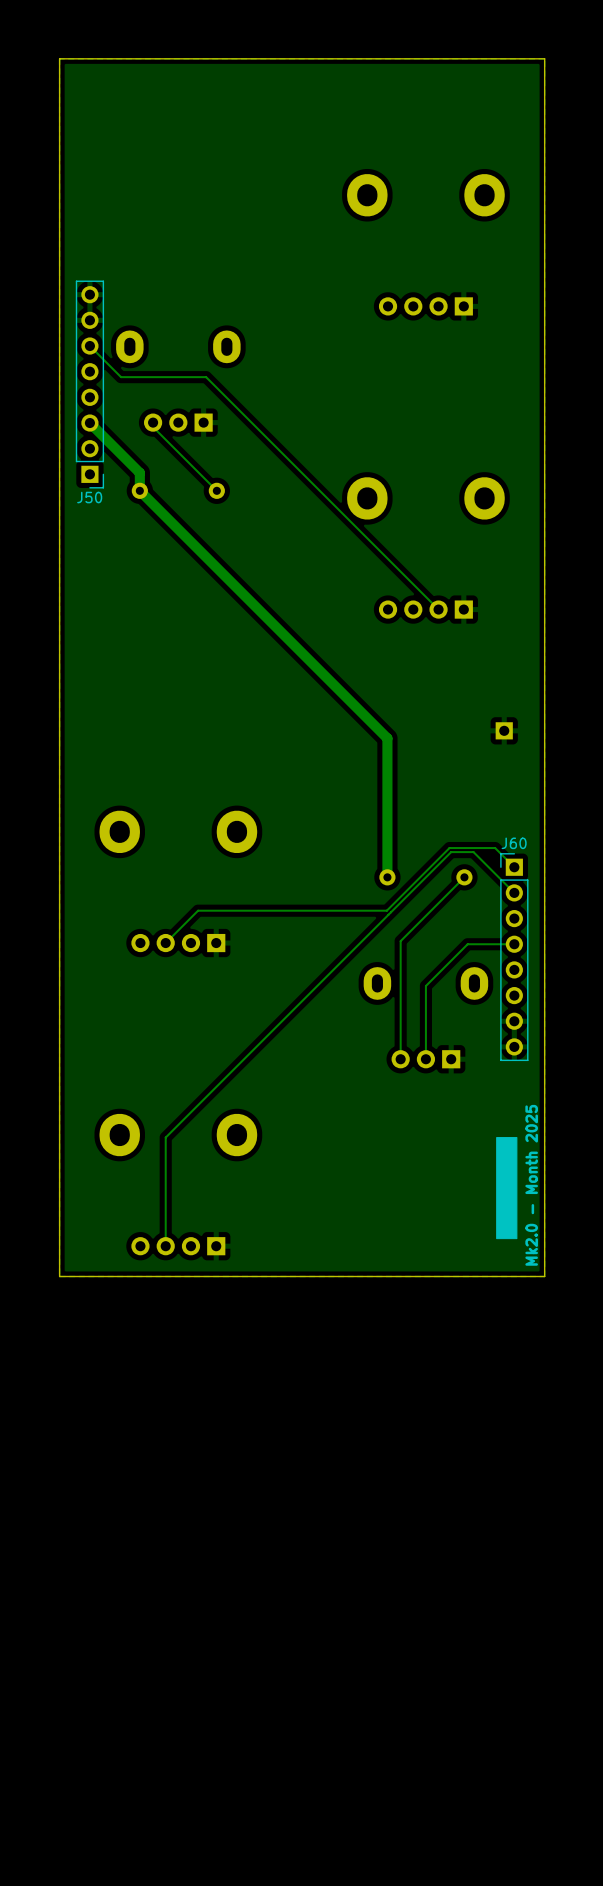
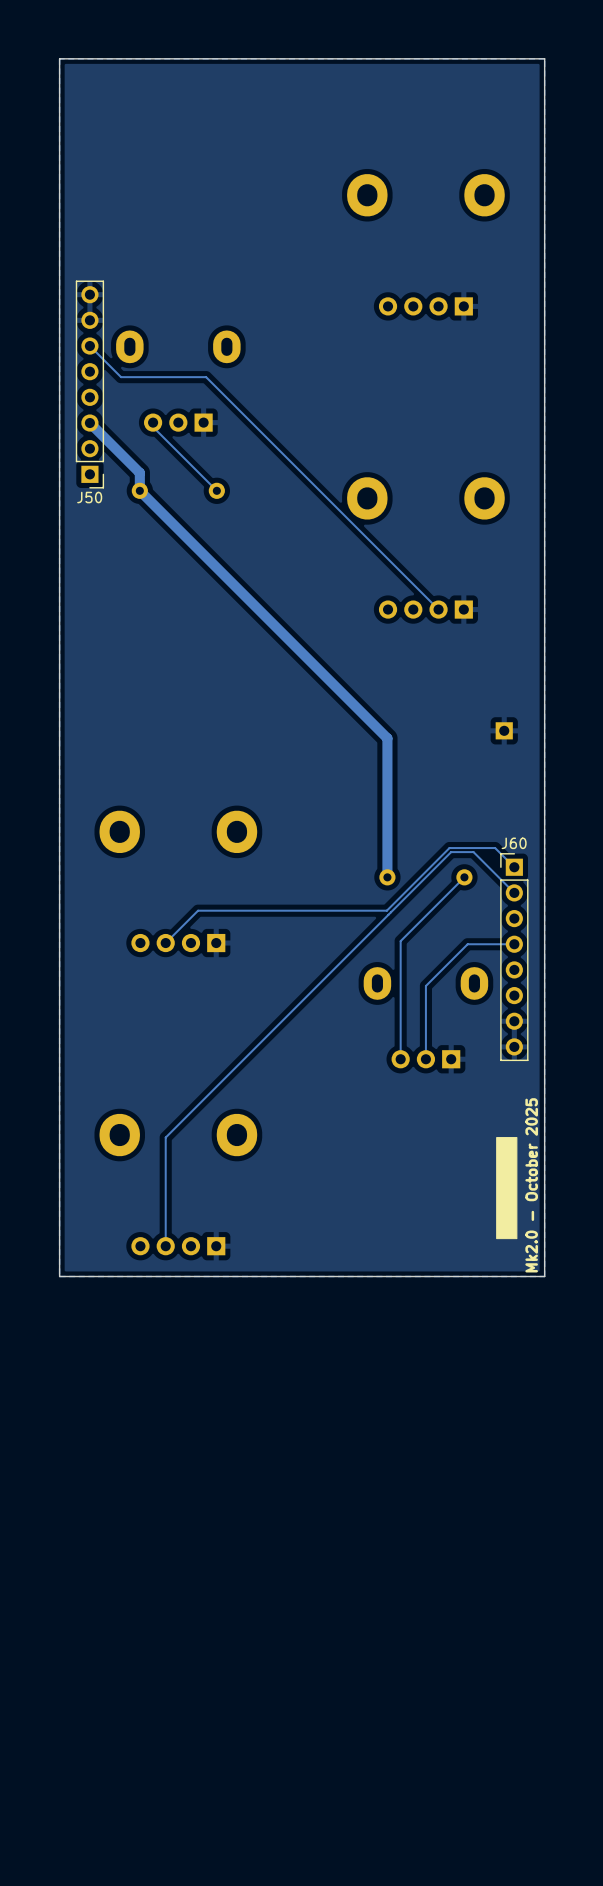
text: Mk2.0 - Month 2025 (531, 1185) -> Mk2.0 - October 2025 (531, 1185)

